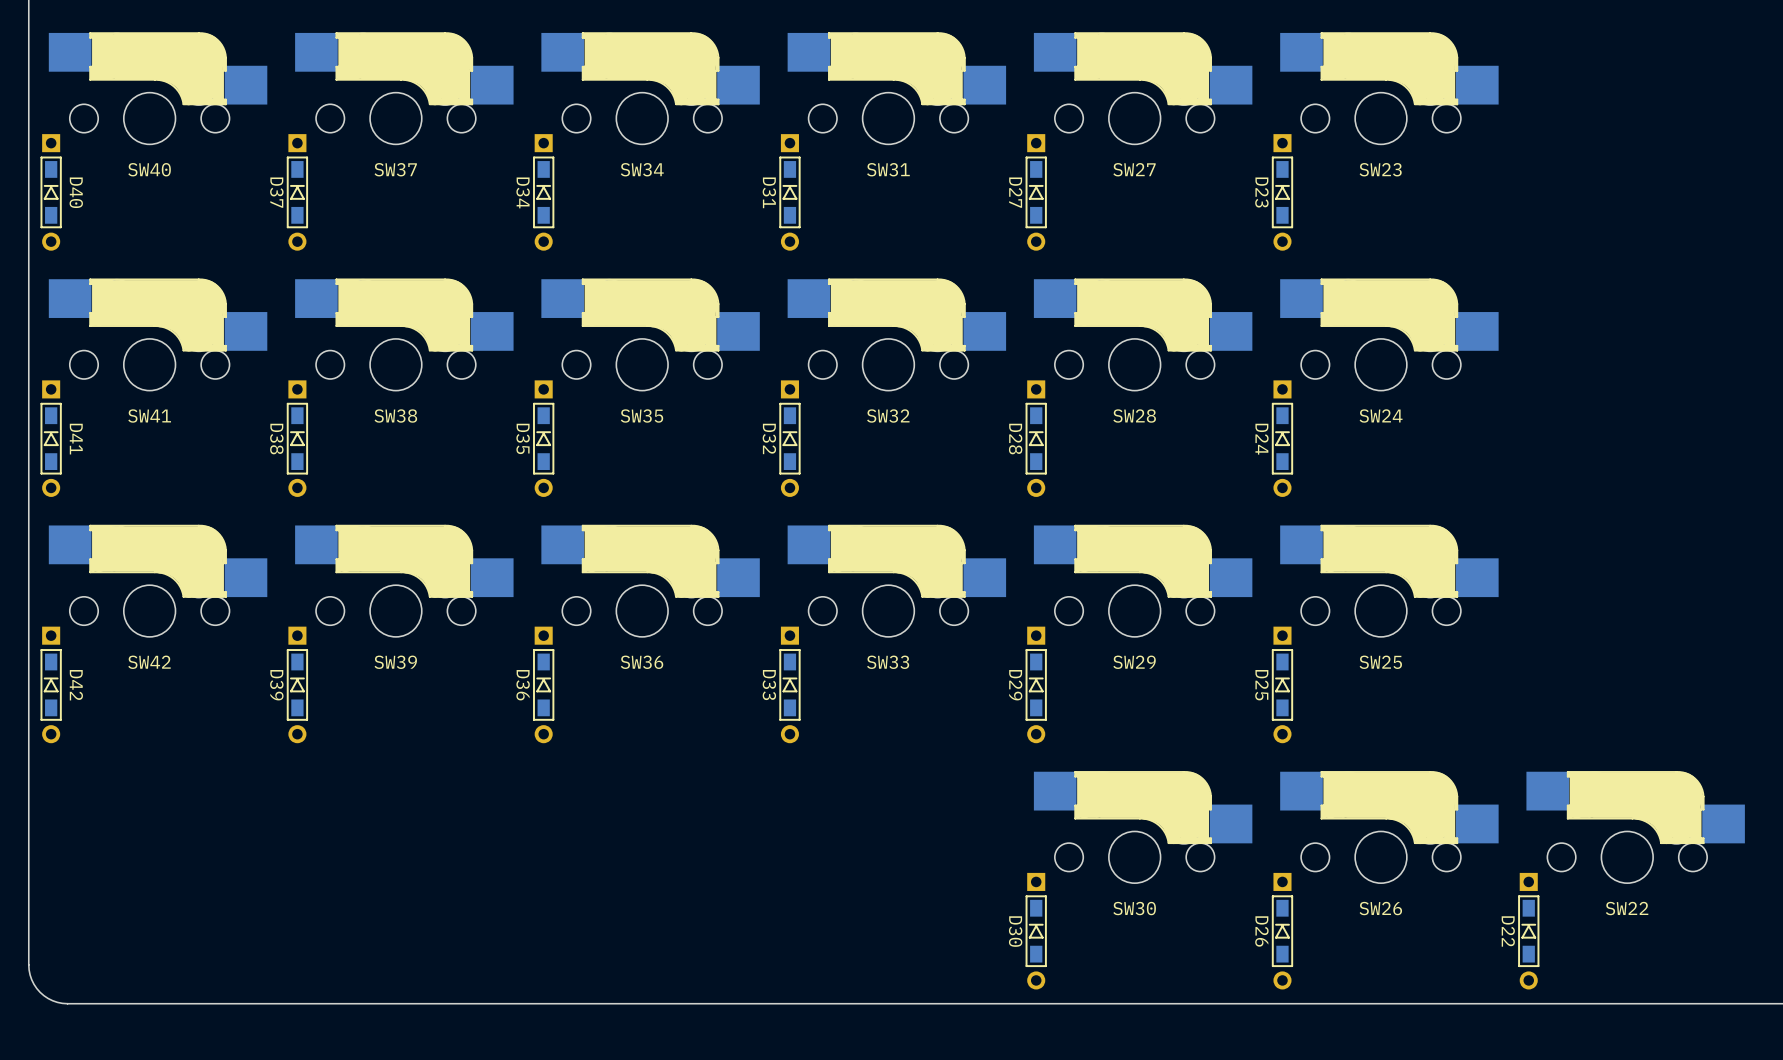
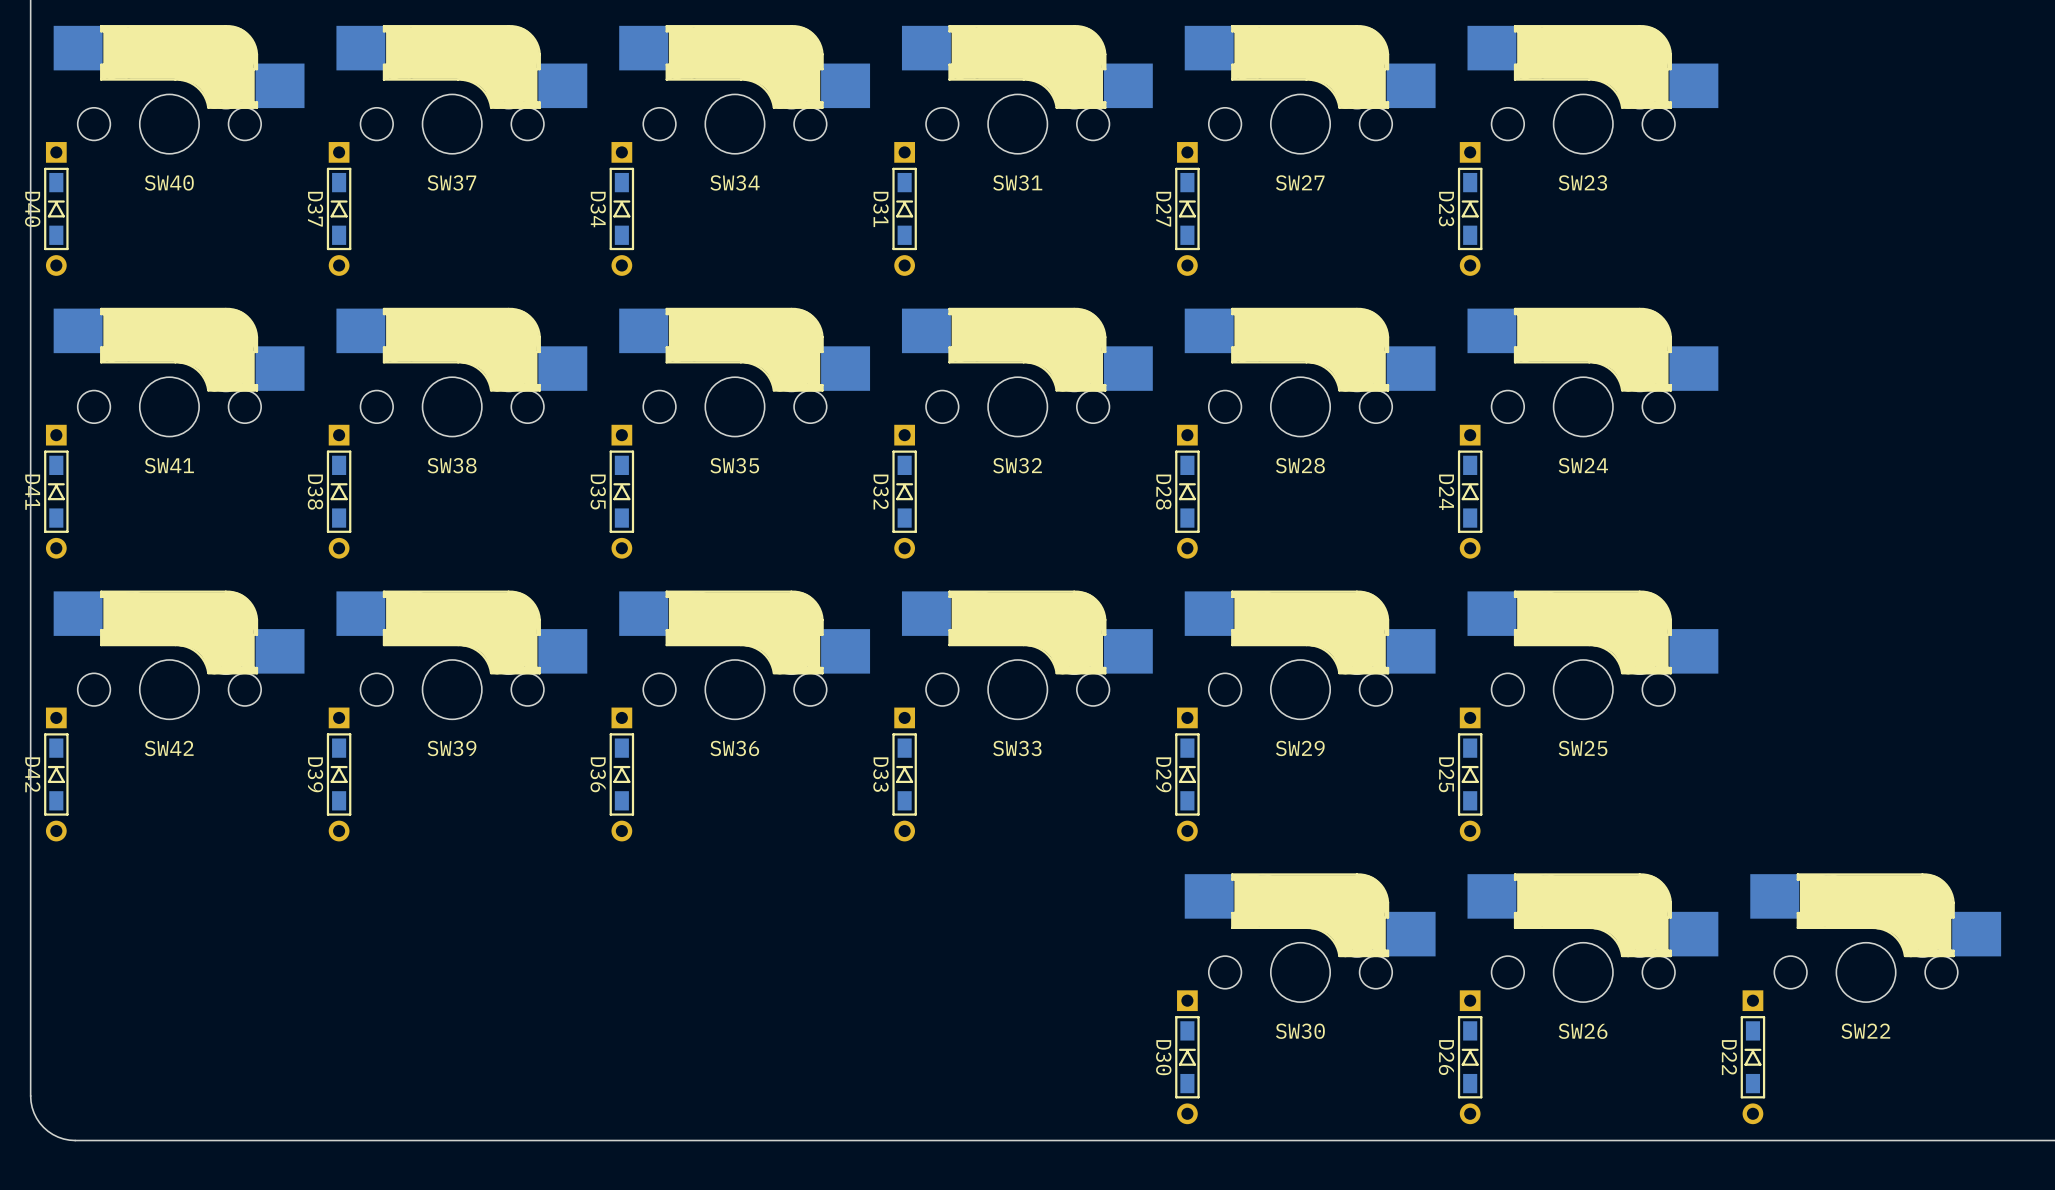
D40 name position: D40 (76, 192) -> D40 (32, 209)
D41 name position: D41 (76, 439) -> D41 (32, 492)
D42 name position: D42 (76, 685) -> D42 (32, 774)

